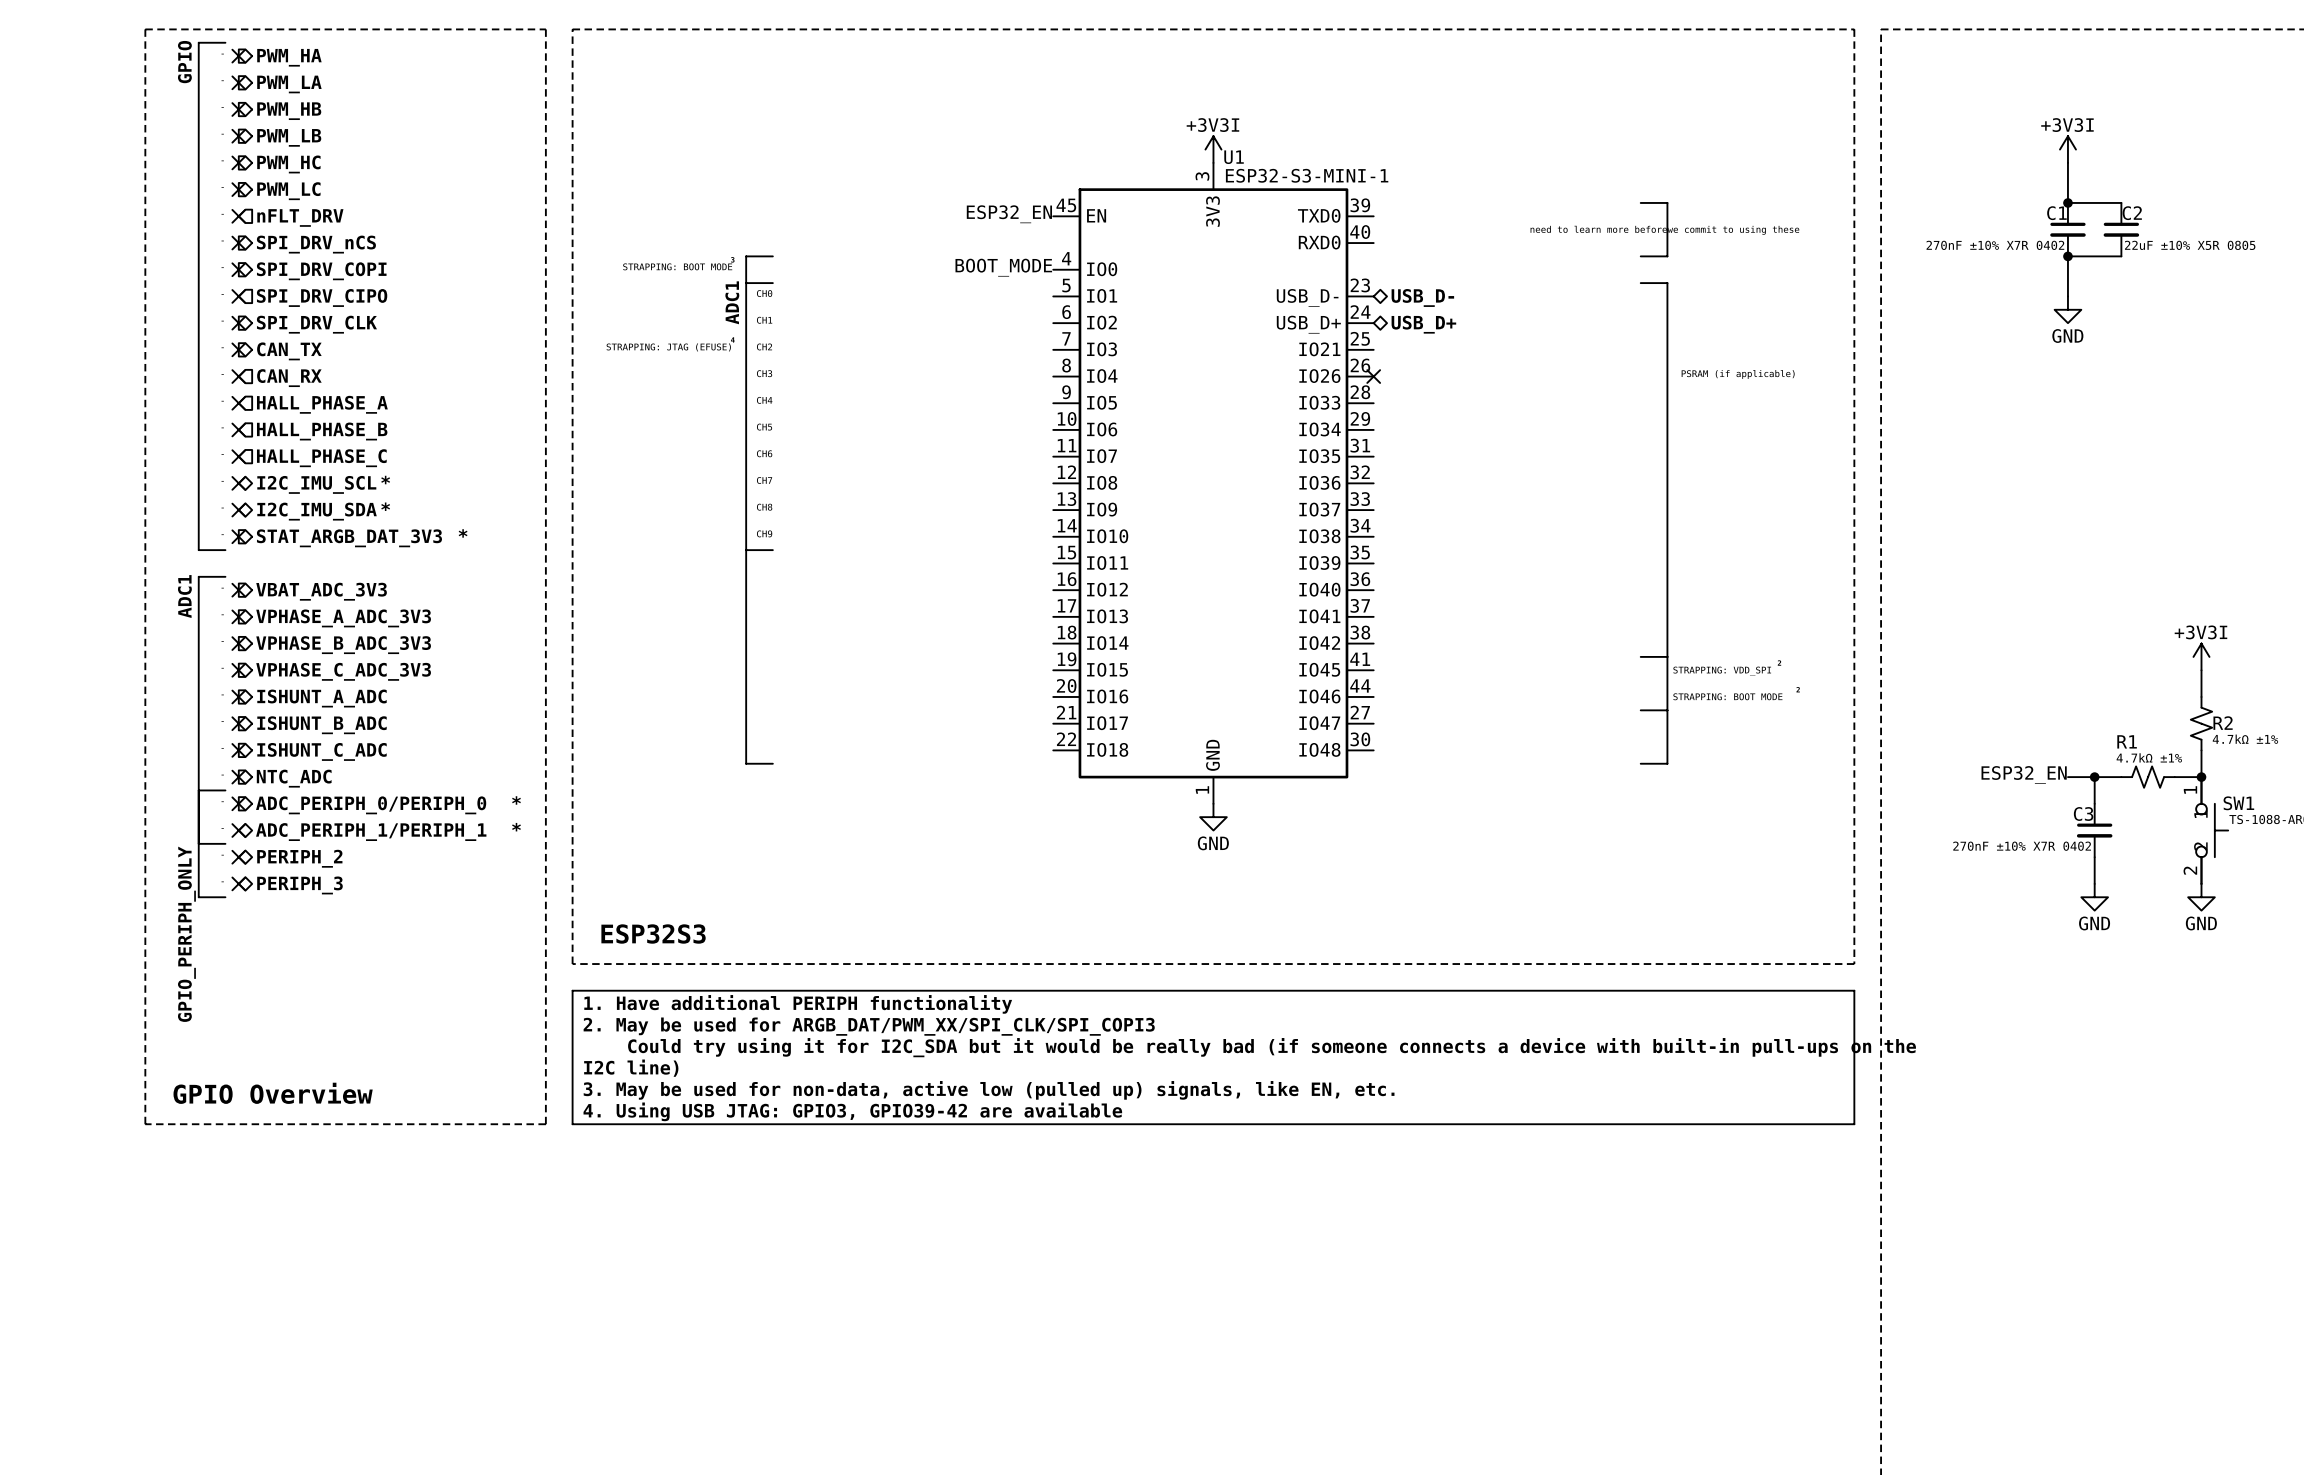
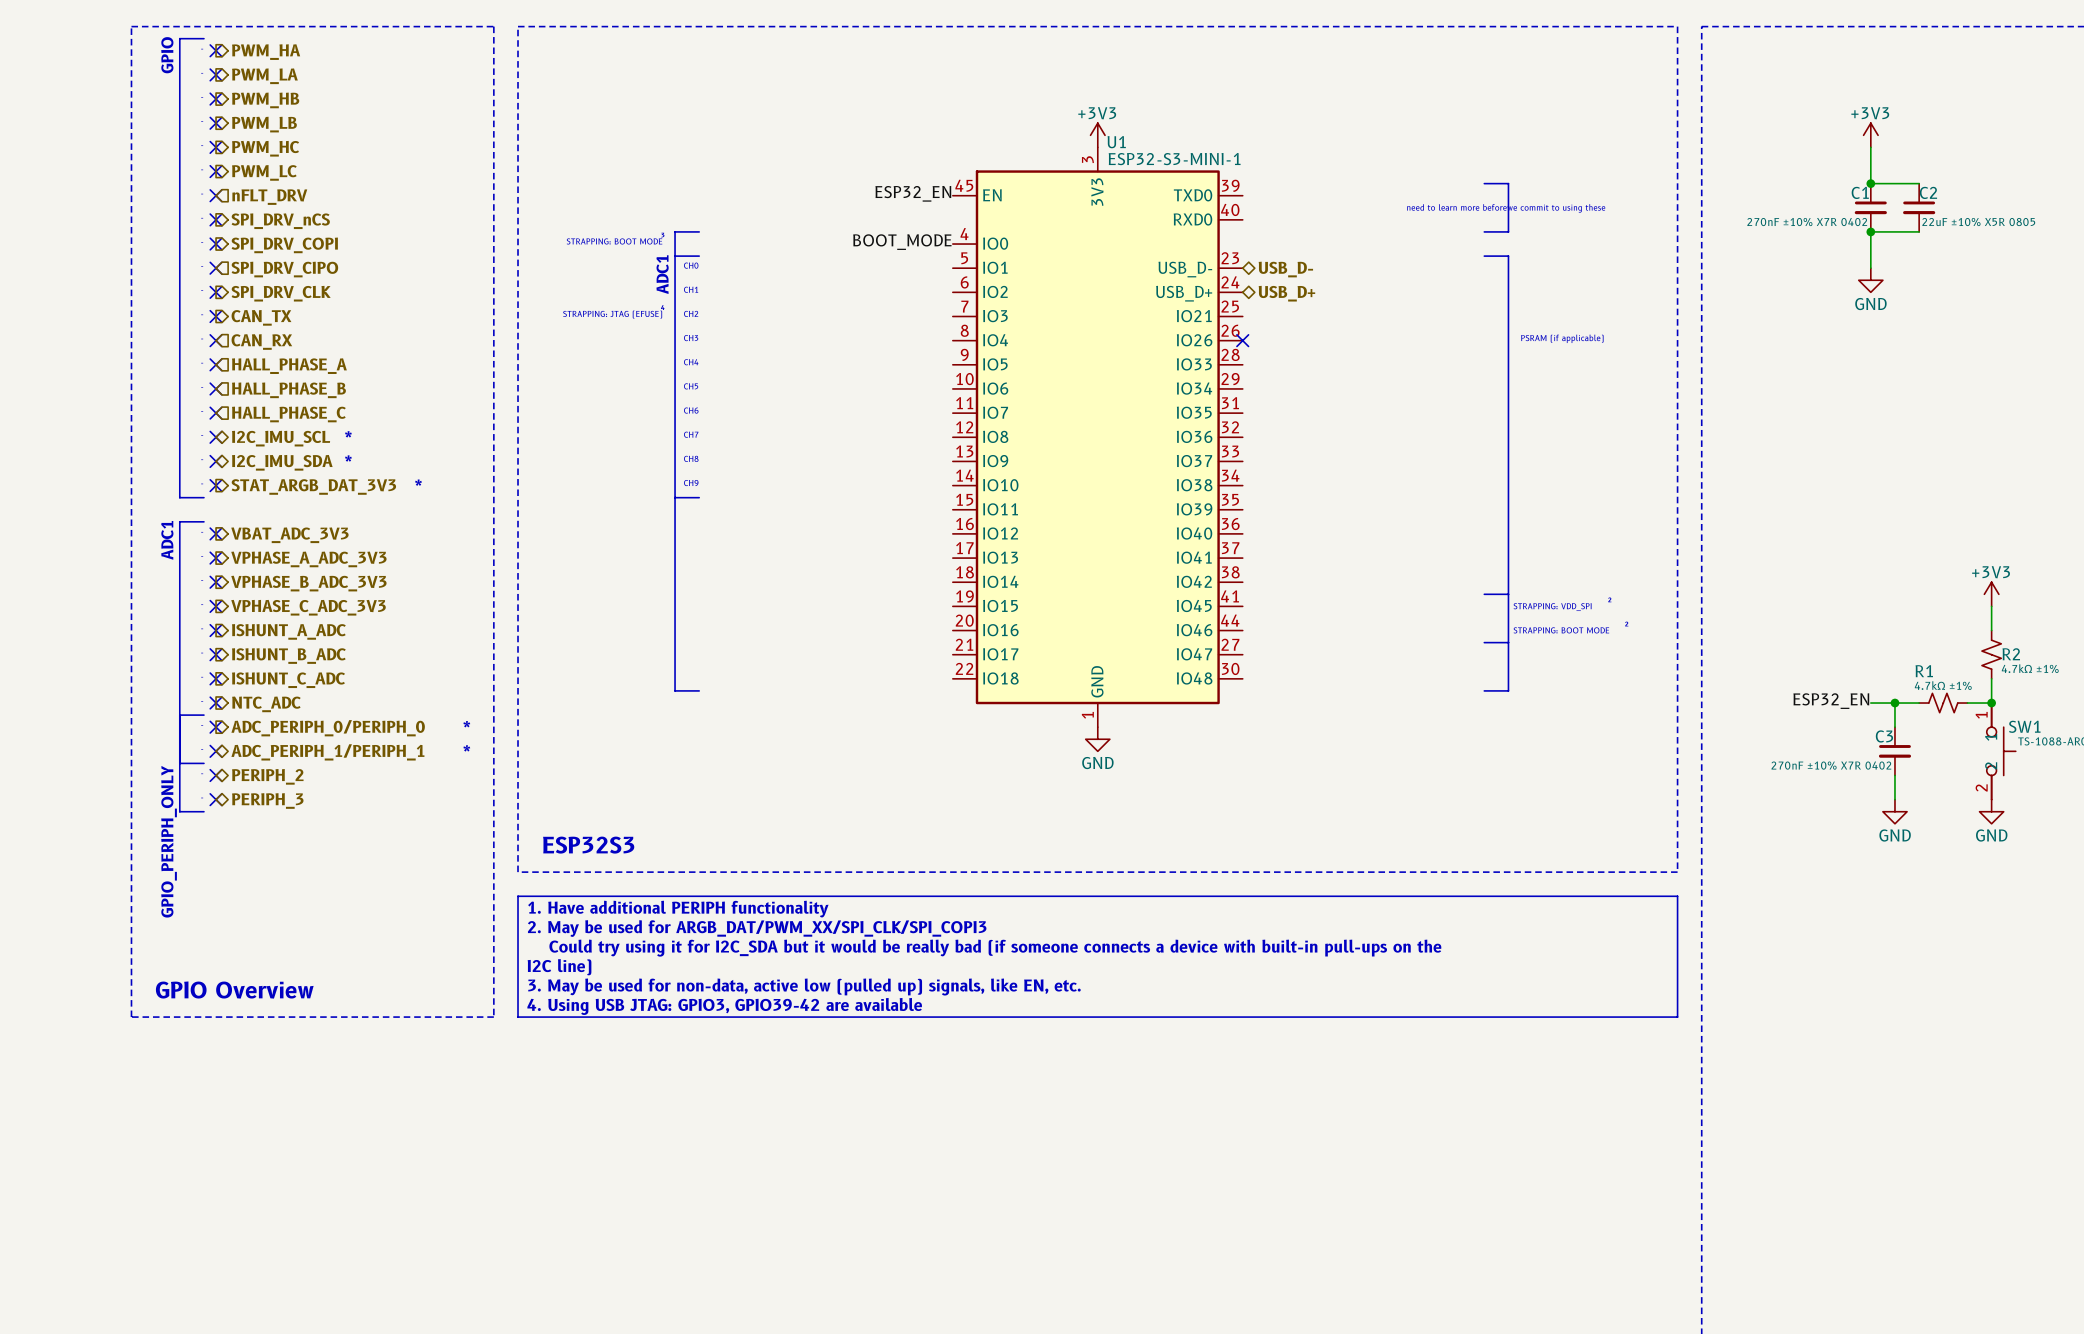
power symbol: +3V3I (1213, 149) -> +3V3 (1097, 135)
power symbol: +3V3I (2067, 149) -> +3V3 (1870, 135)
power symbol: +3V3I (2201, 656) -> +3V3 (1991, 594)

